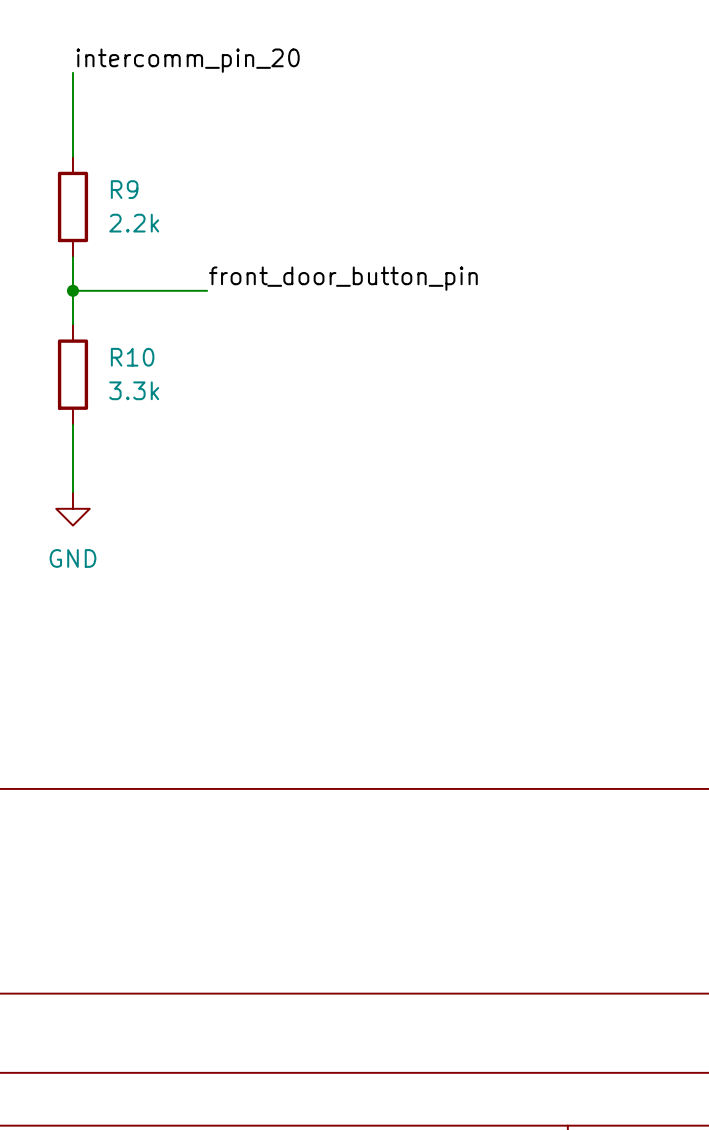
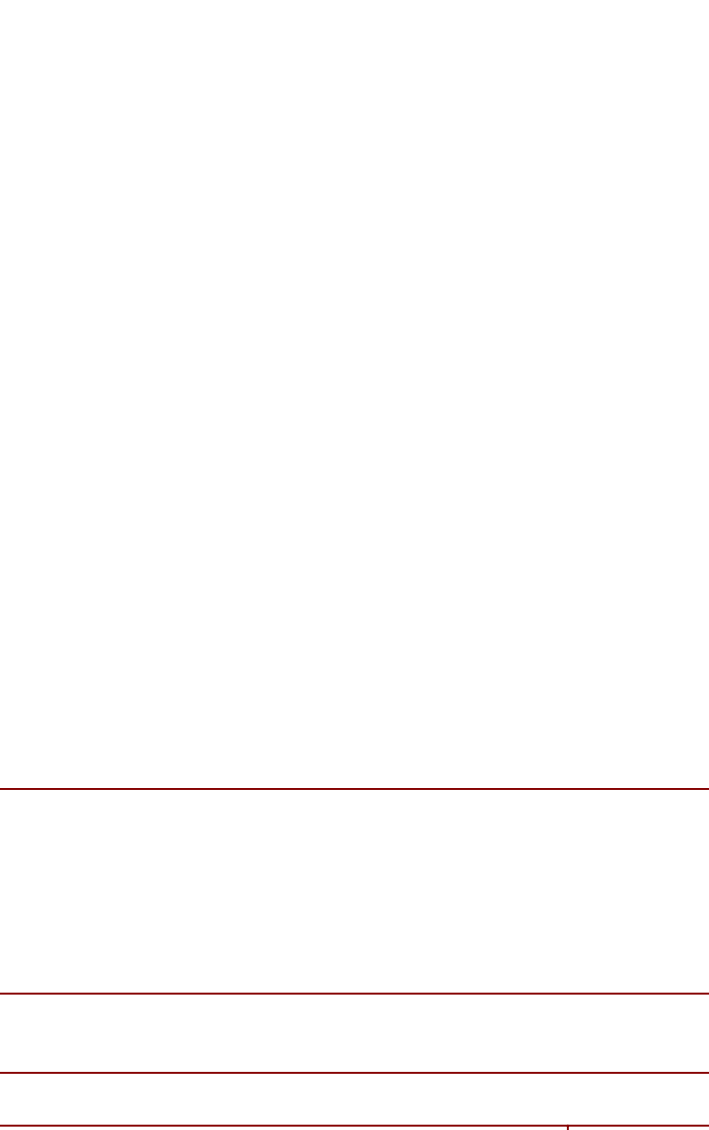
label: intercomm_pin_20 (188, 60) -> none
wire: (72, 72) (72, 156) -> none
R9: 2.2k (72, 206) -> none
wire: (72, 257) (72, 324) -> none
label: front_door_button_pin (343, 278) -> none
wire: (72, 290) (207, 290) -> none
junction: (72, 290) -> none
R10: 3.3k (72, 374) -> none
wire: (72, 424) (72, 492) -> none
power symbol: GND (72, 508) -> none

